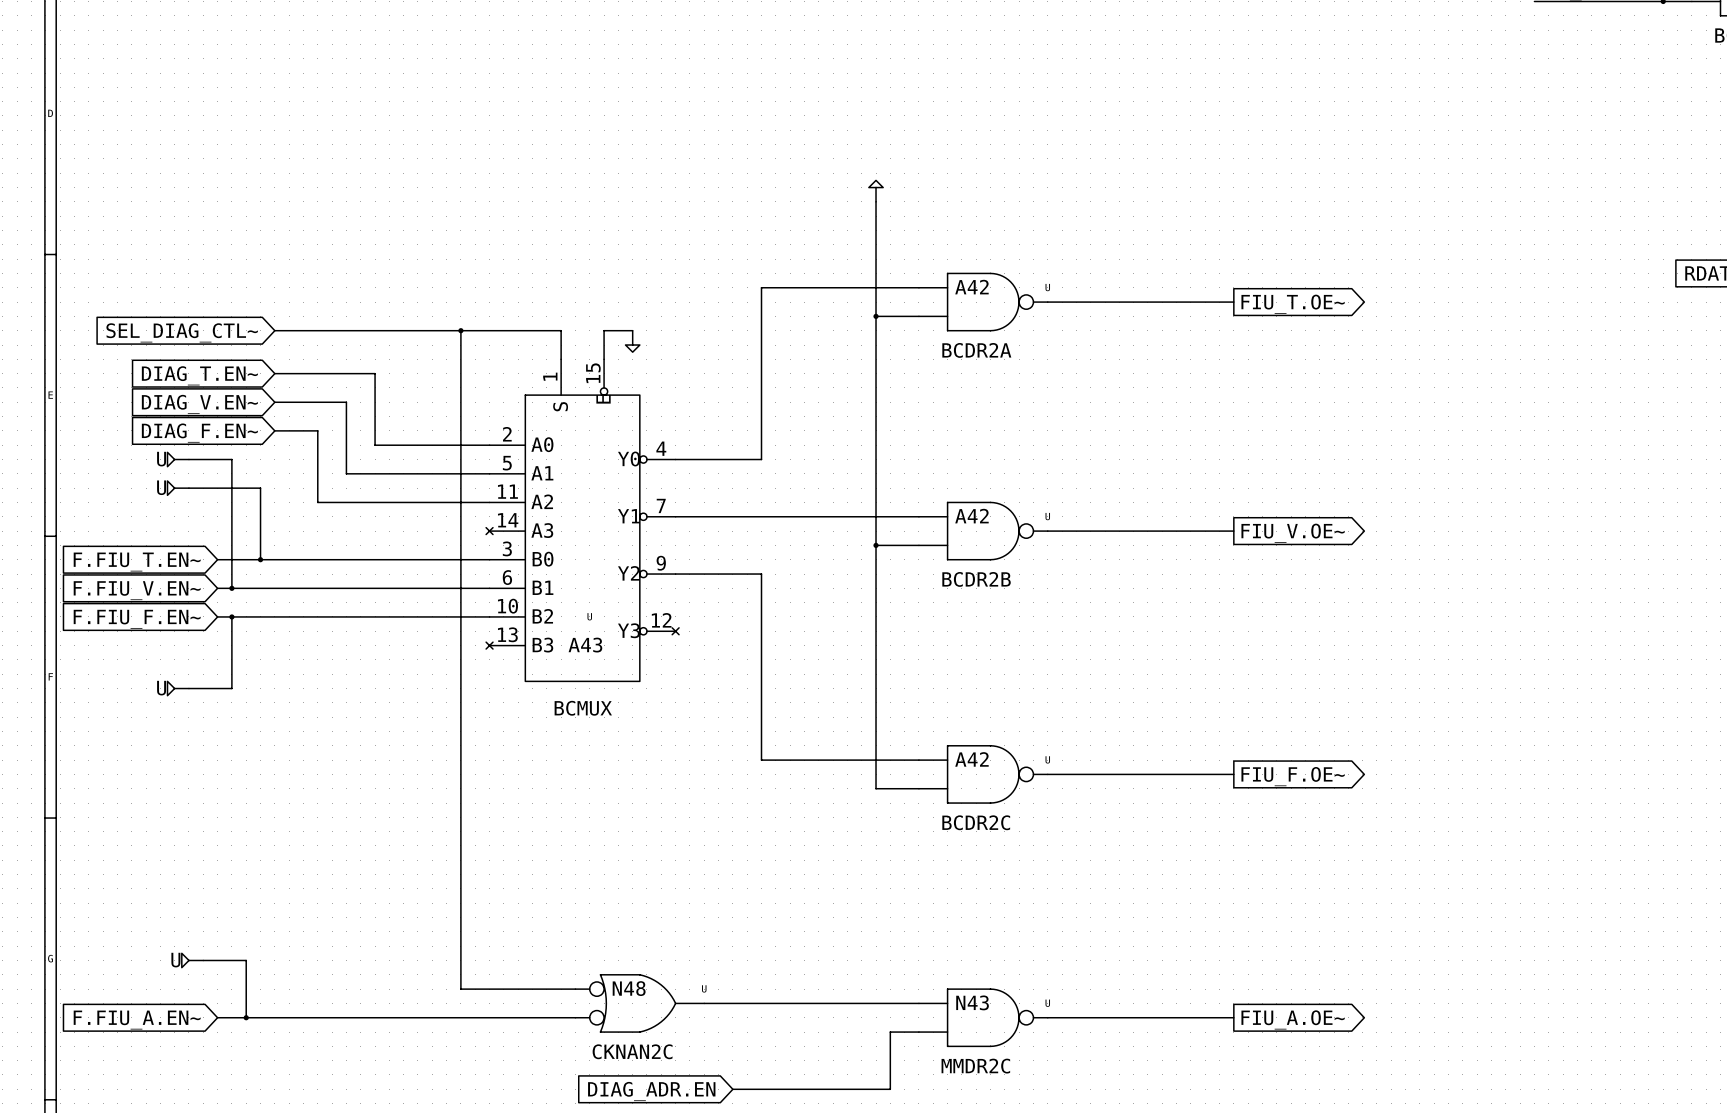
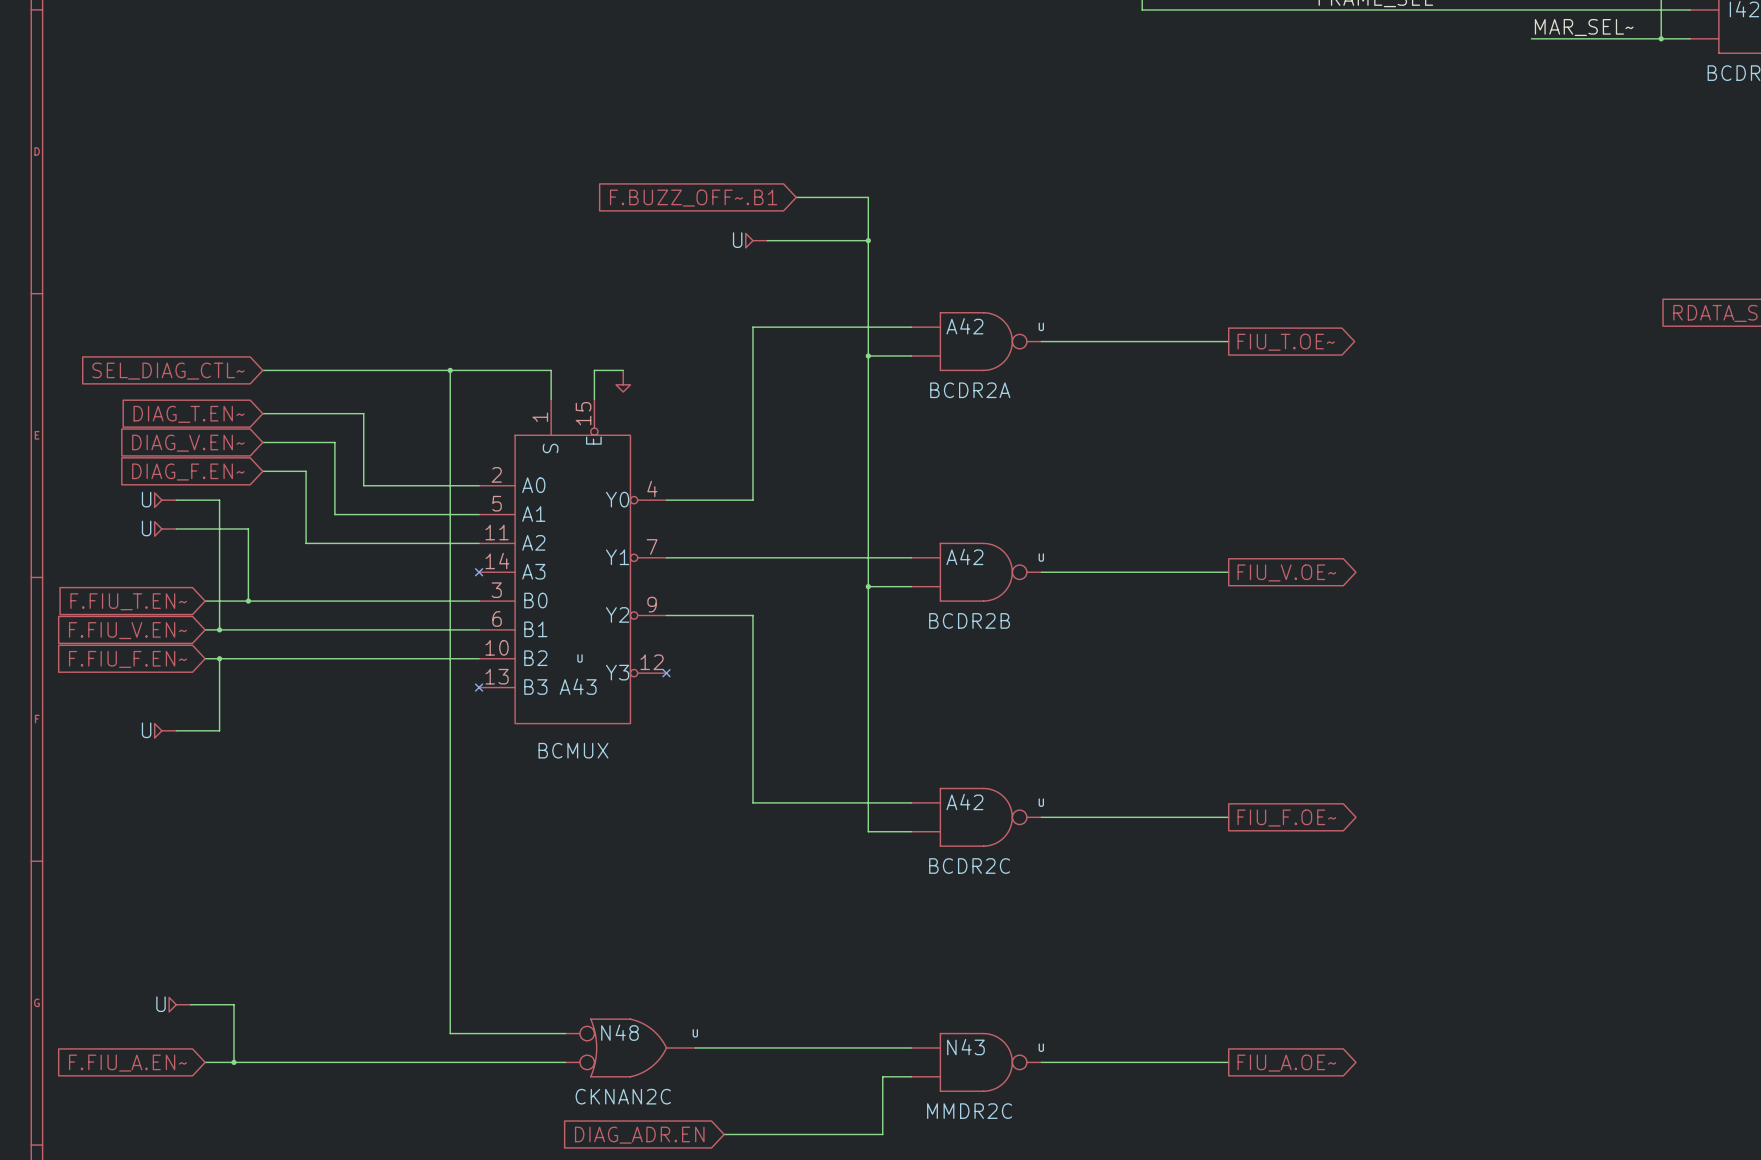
wire: none -> (796, 197) (868, 197) (868, 240) (767, 240)
global label: none -> F.BUZZ_OFF~.B1 (693, 198)
power symbol: (876, 190) -> none
U: none -> (756, 240)
junction: none -> (868, 240)

